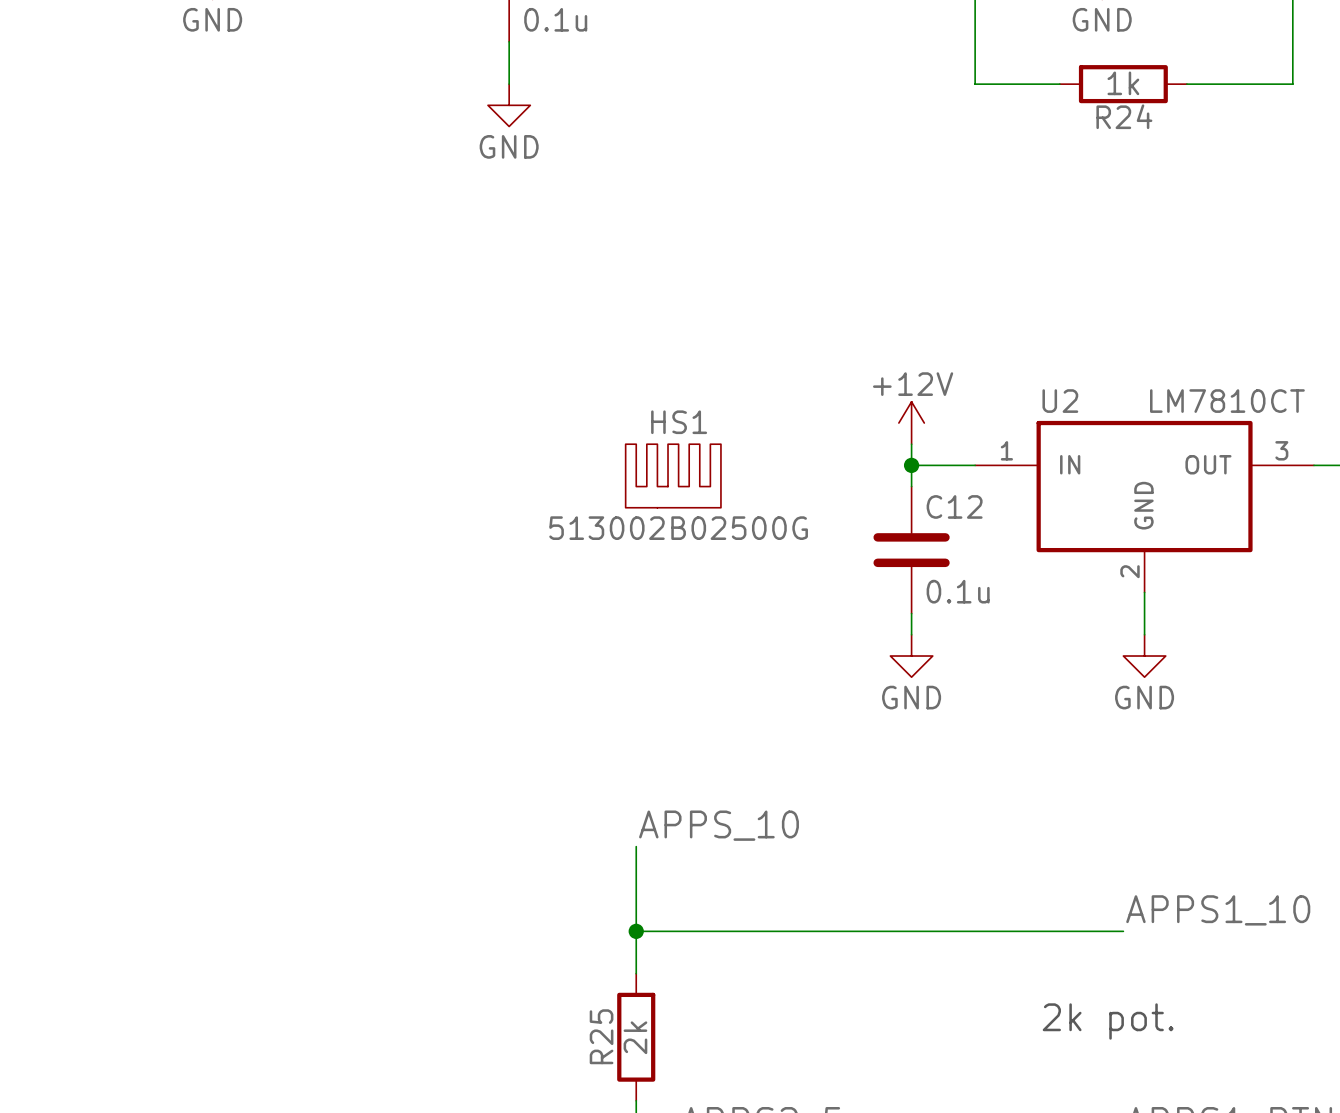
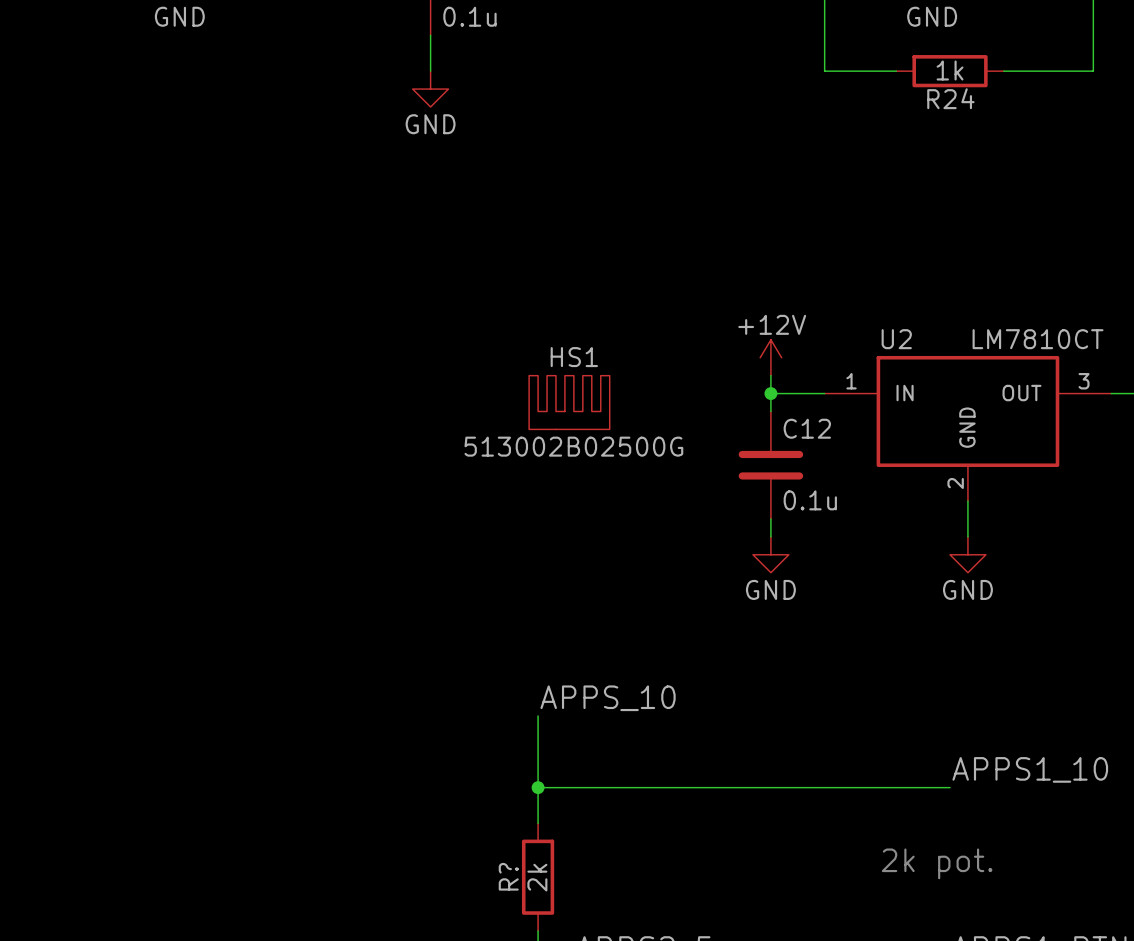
R25 name: R25 (601, 1036) -> R? (508, 876)

